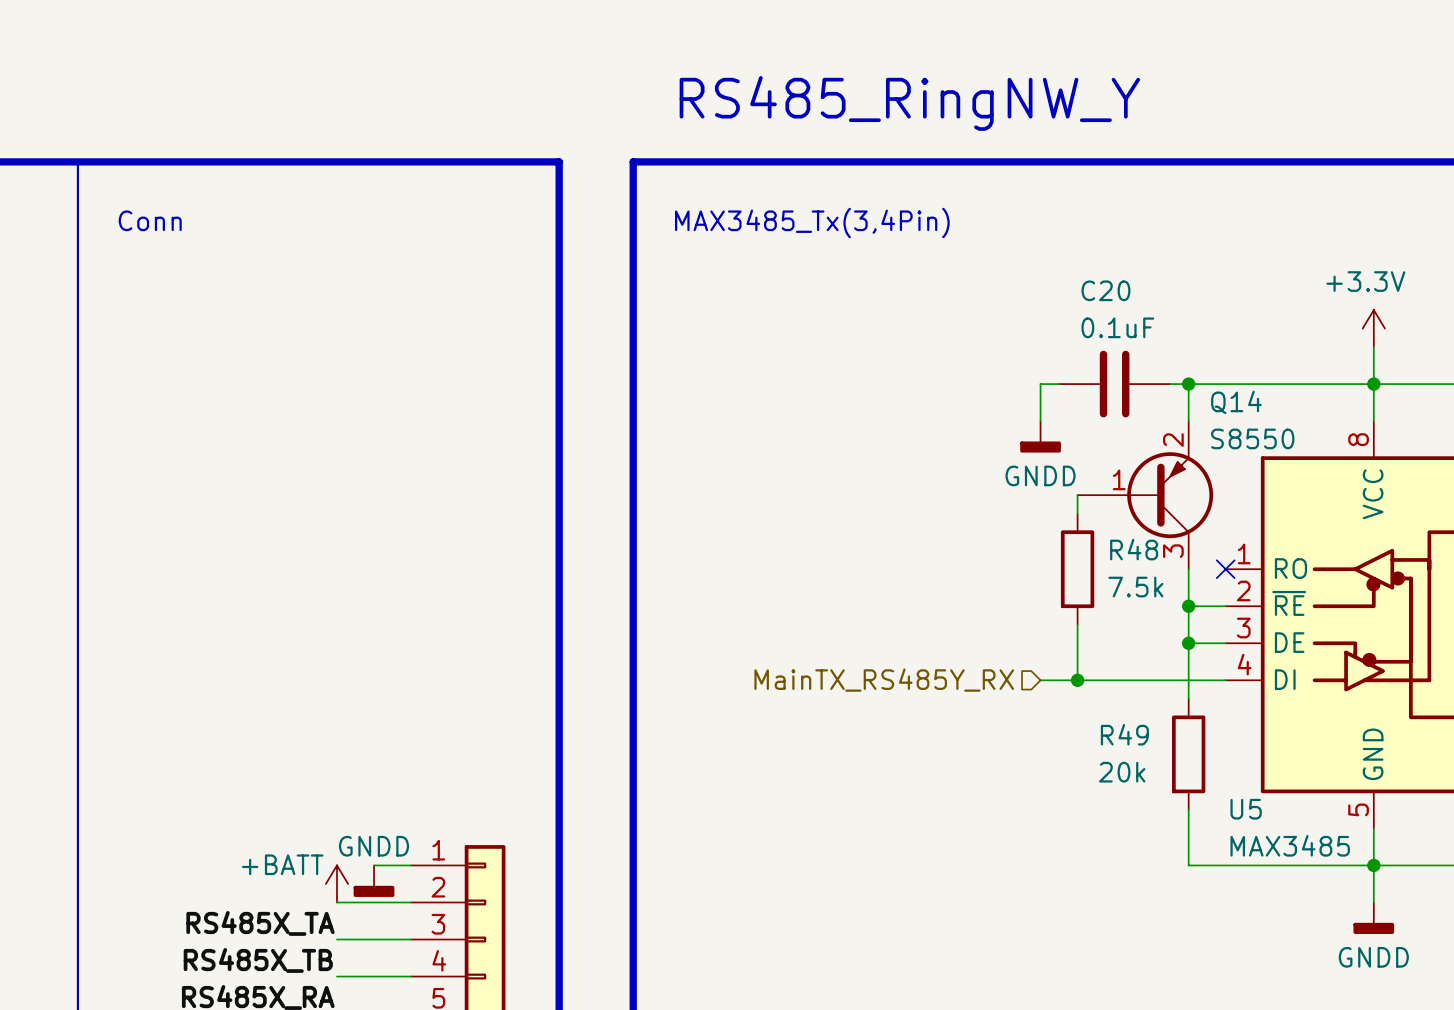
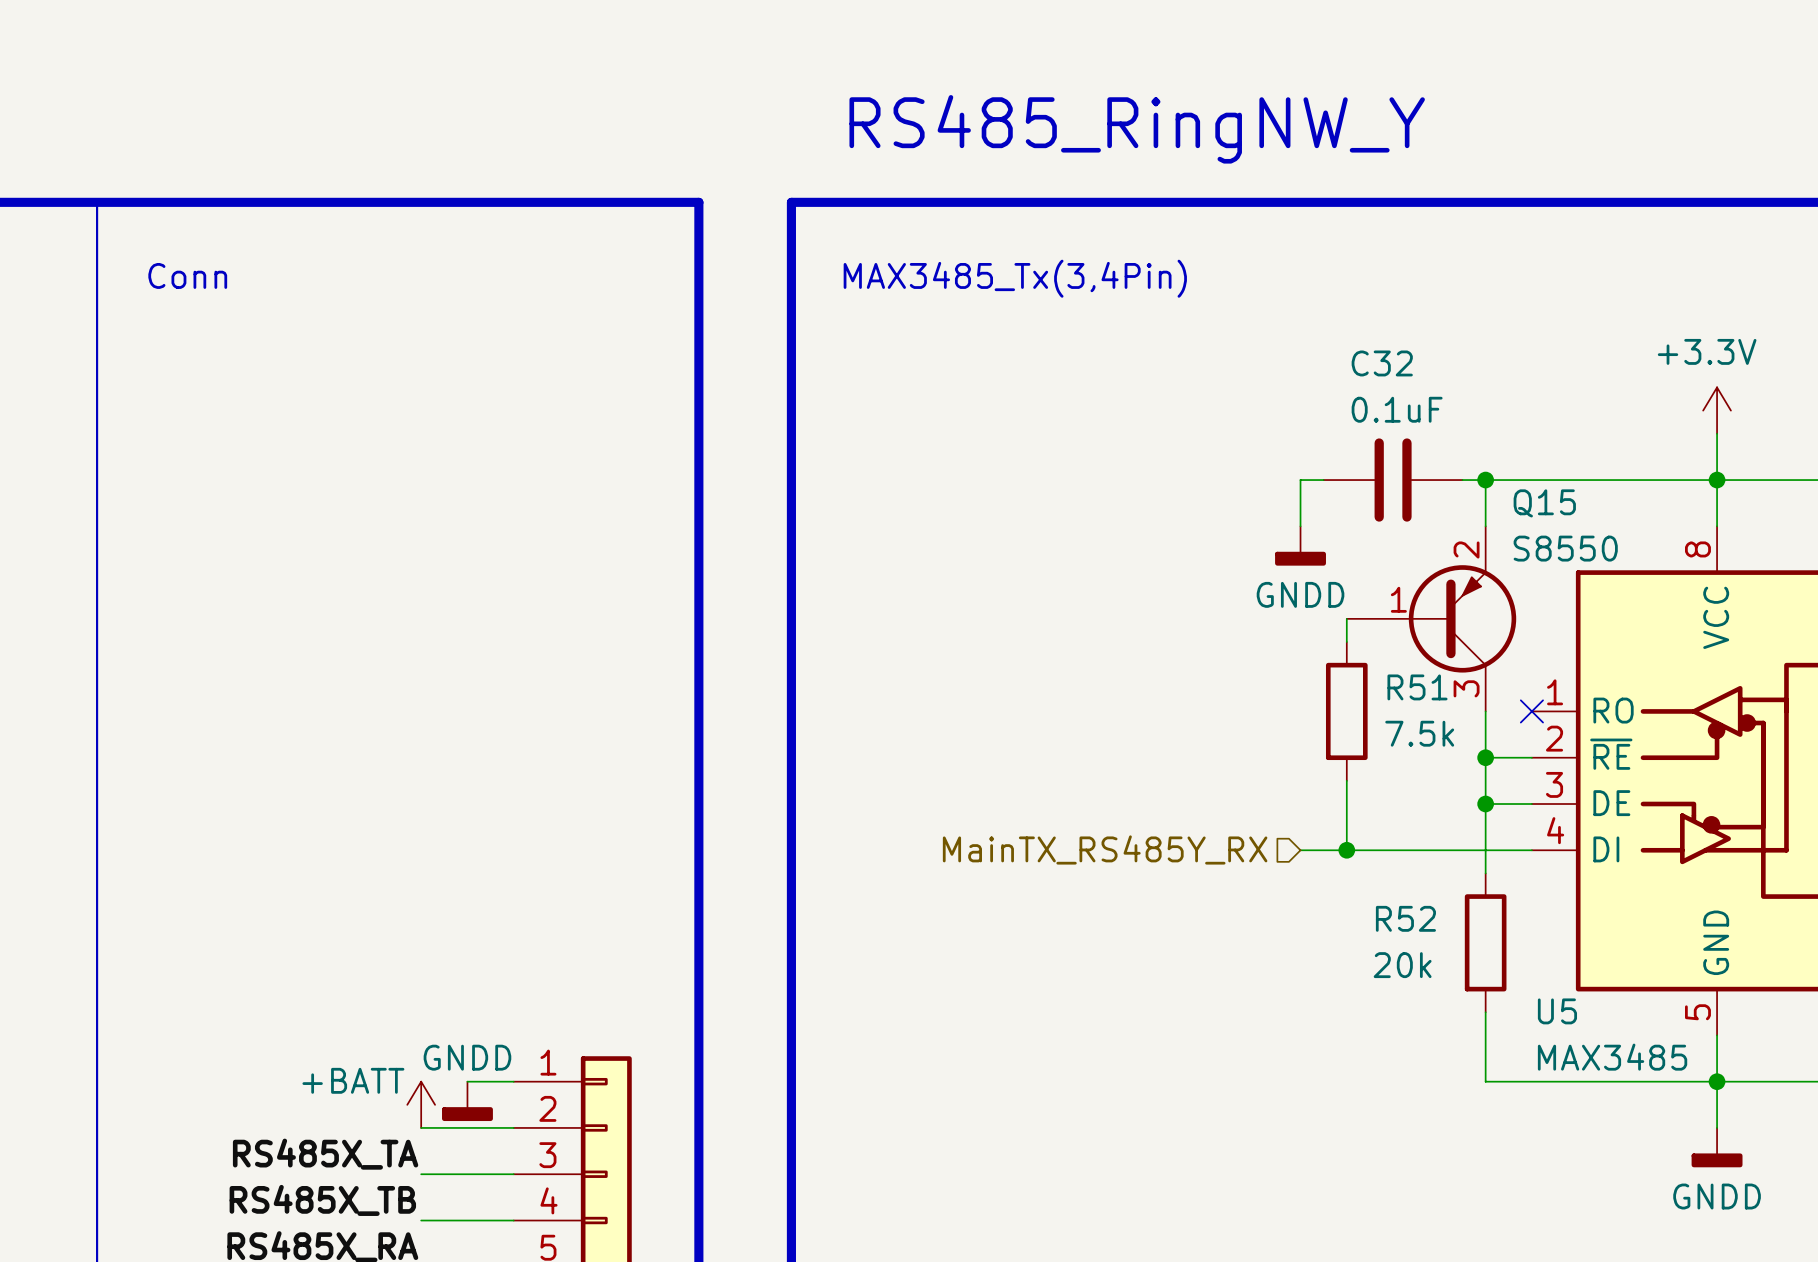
C20 name: C20 (1105, 290) -> C32 (1382, 363)
Q14 name: Q14 (1236, 402) -> Q15 (1544, 503)
R48 name: R48 (1134, 549) -> R51 (1417, 687)
R49 name: R49 (1124, 734) -> R52 (1405, 918)

